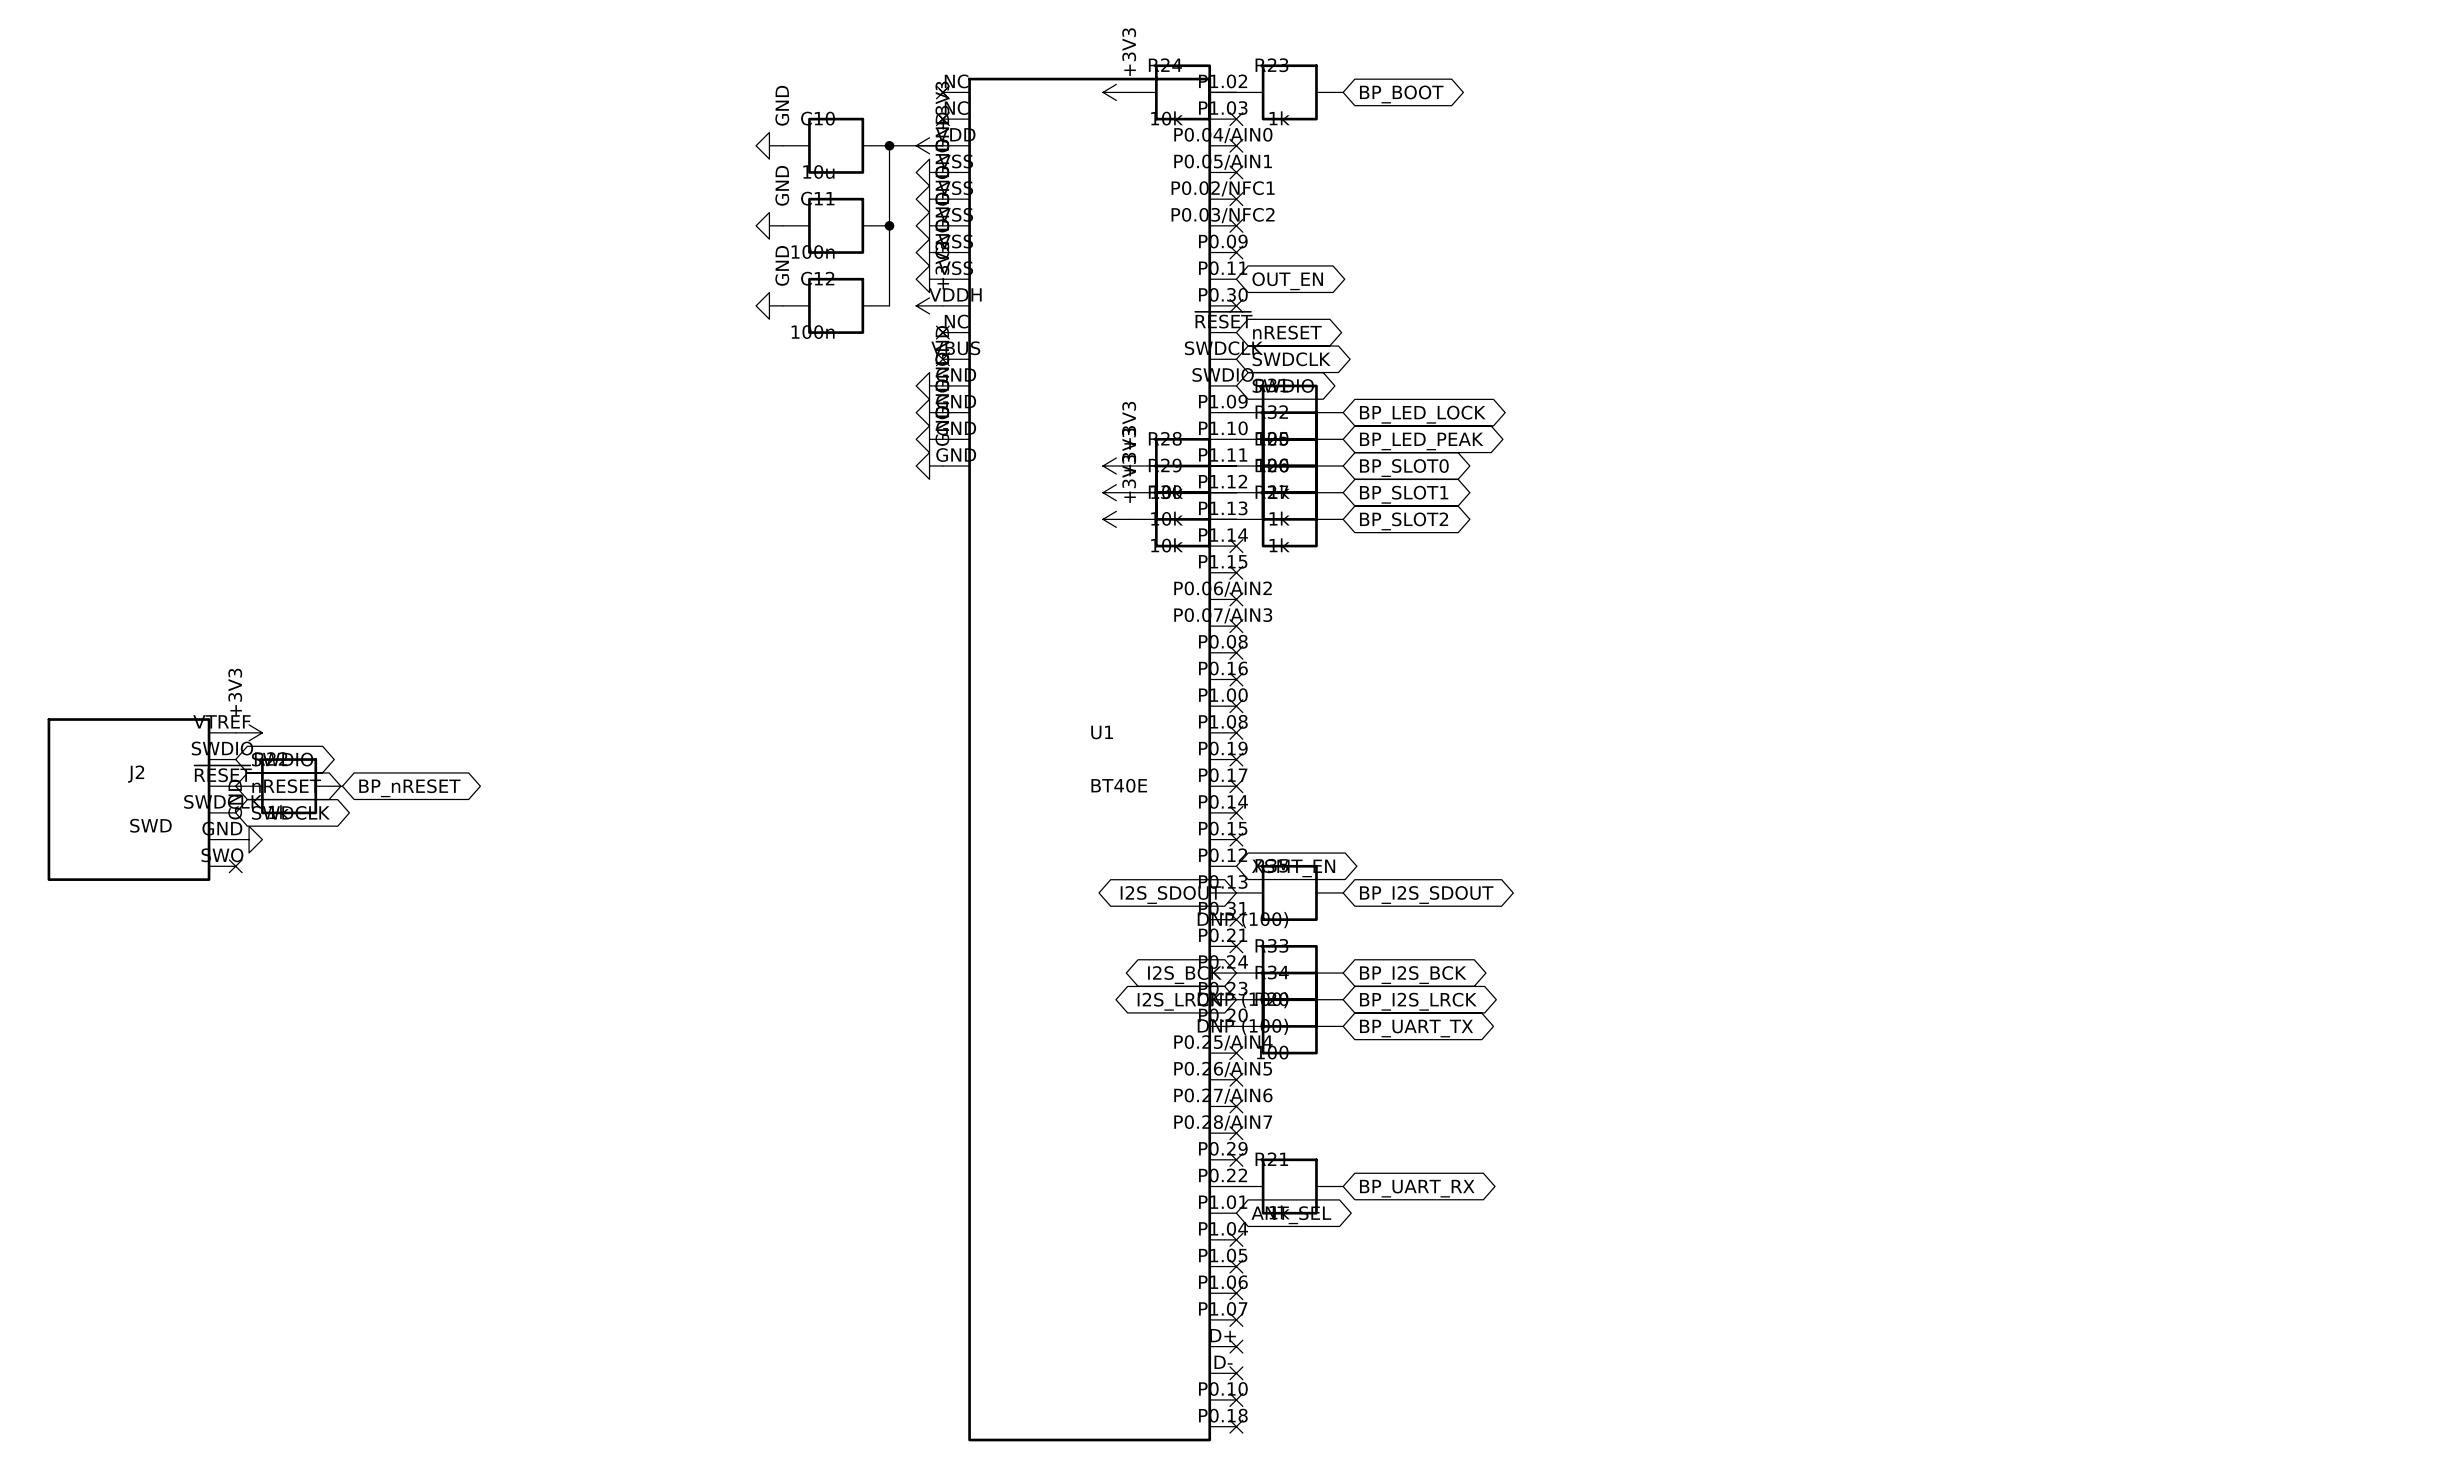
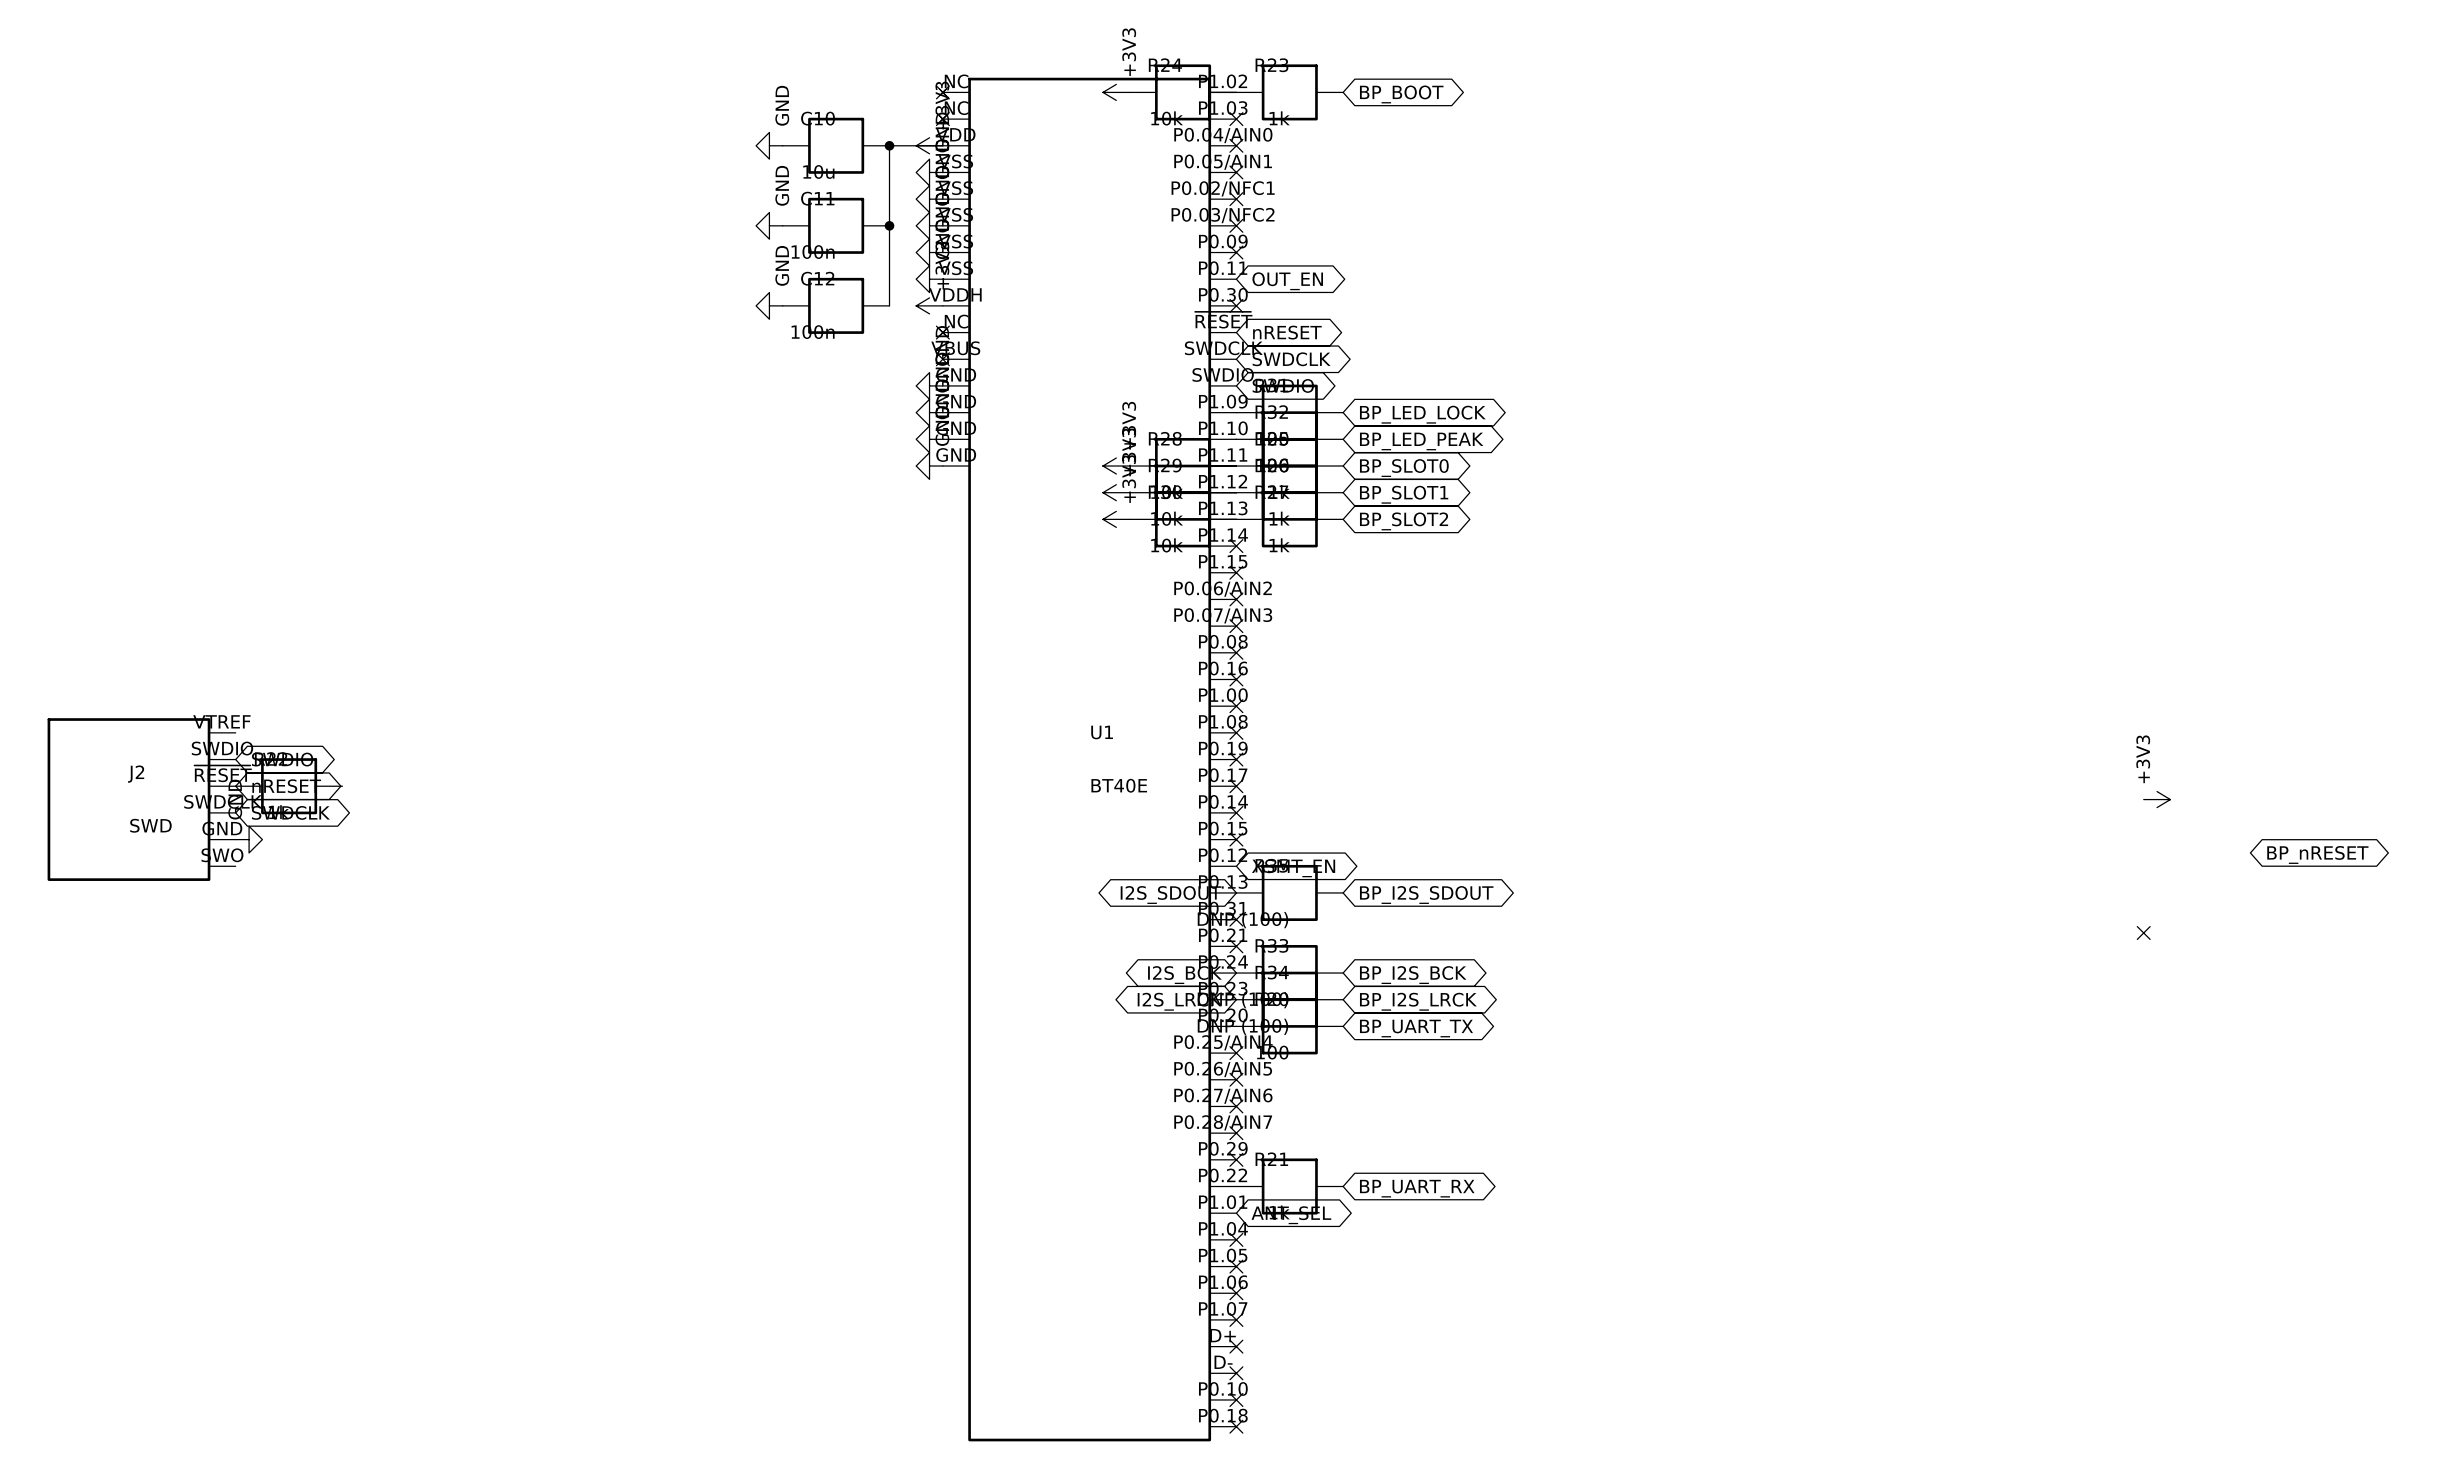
power symbol: +3V3 (249, 732) -> none
global label: BP_nRESET (409, 788) -> none
power symbol: none -> +3V3 (2157, 799)
global label: none -> BP_nRESET (2317, 854)
no-connect mark: (235, 866) -> none
no-connect mark: none -> (2143, 933)

